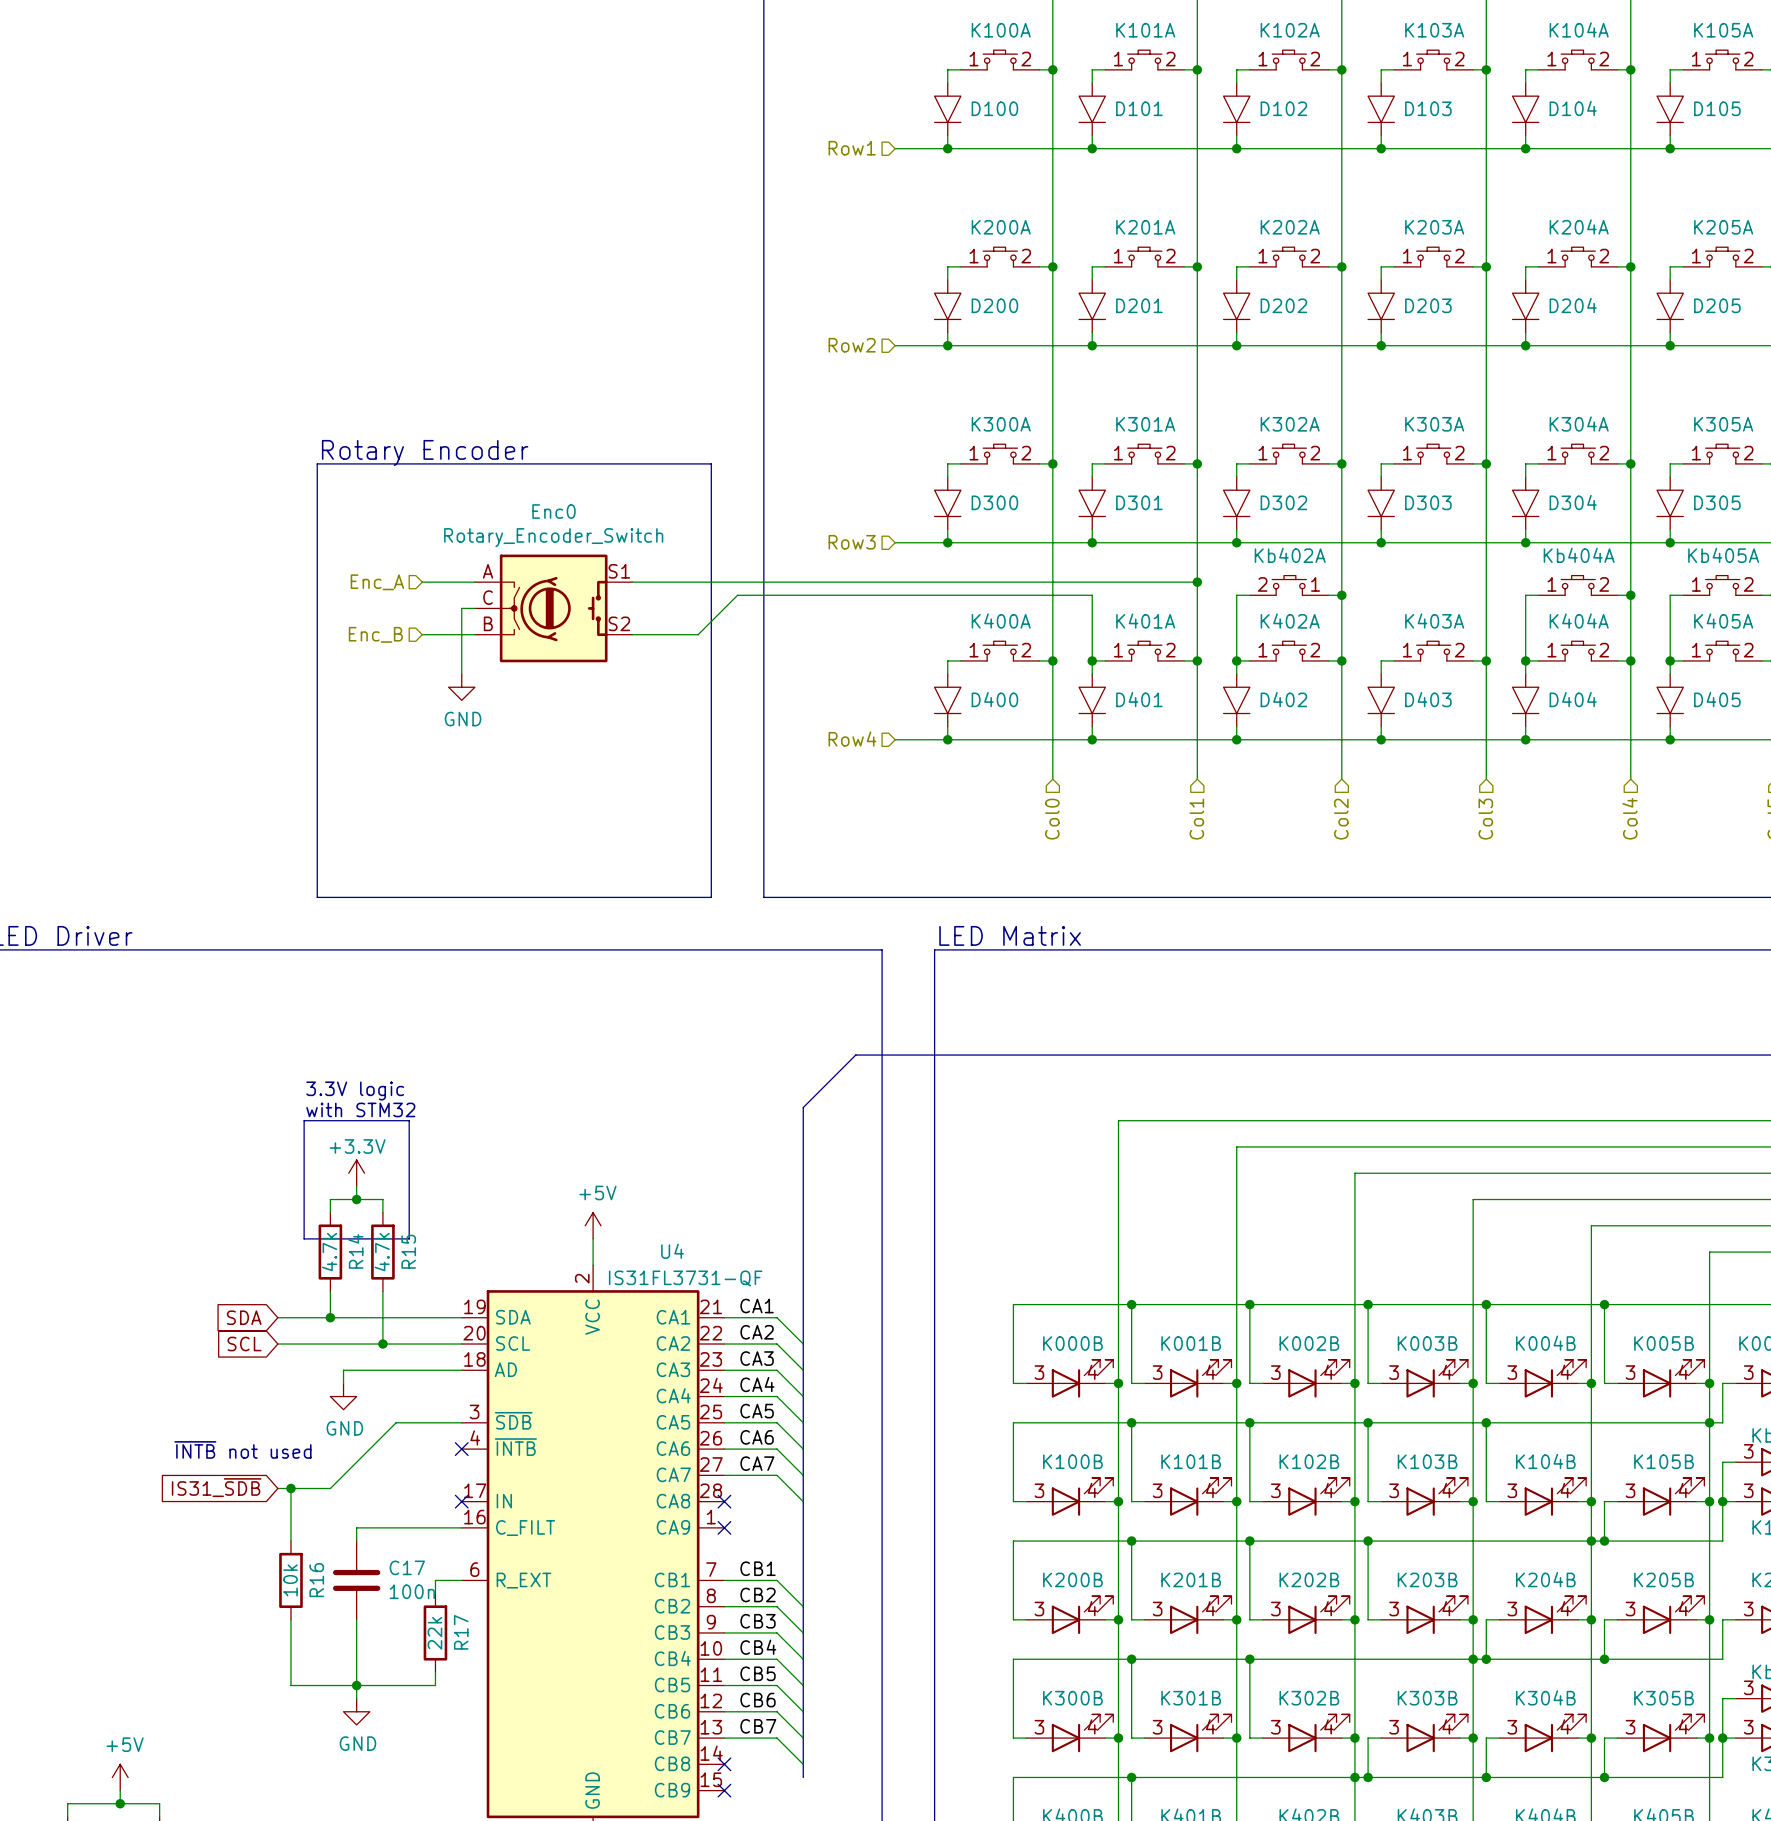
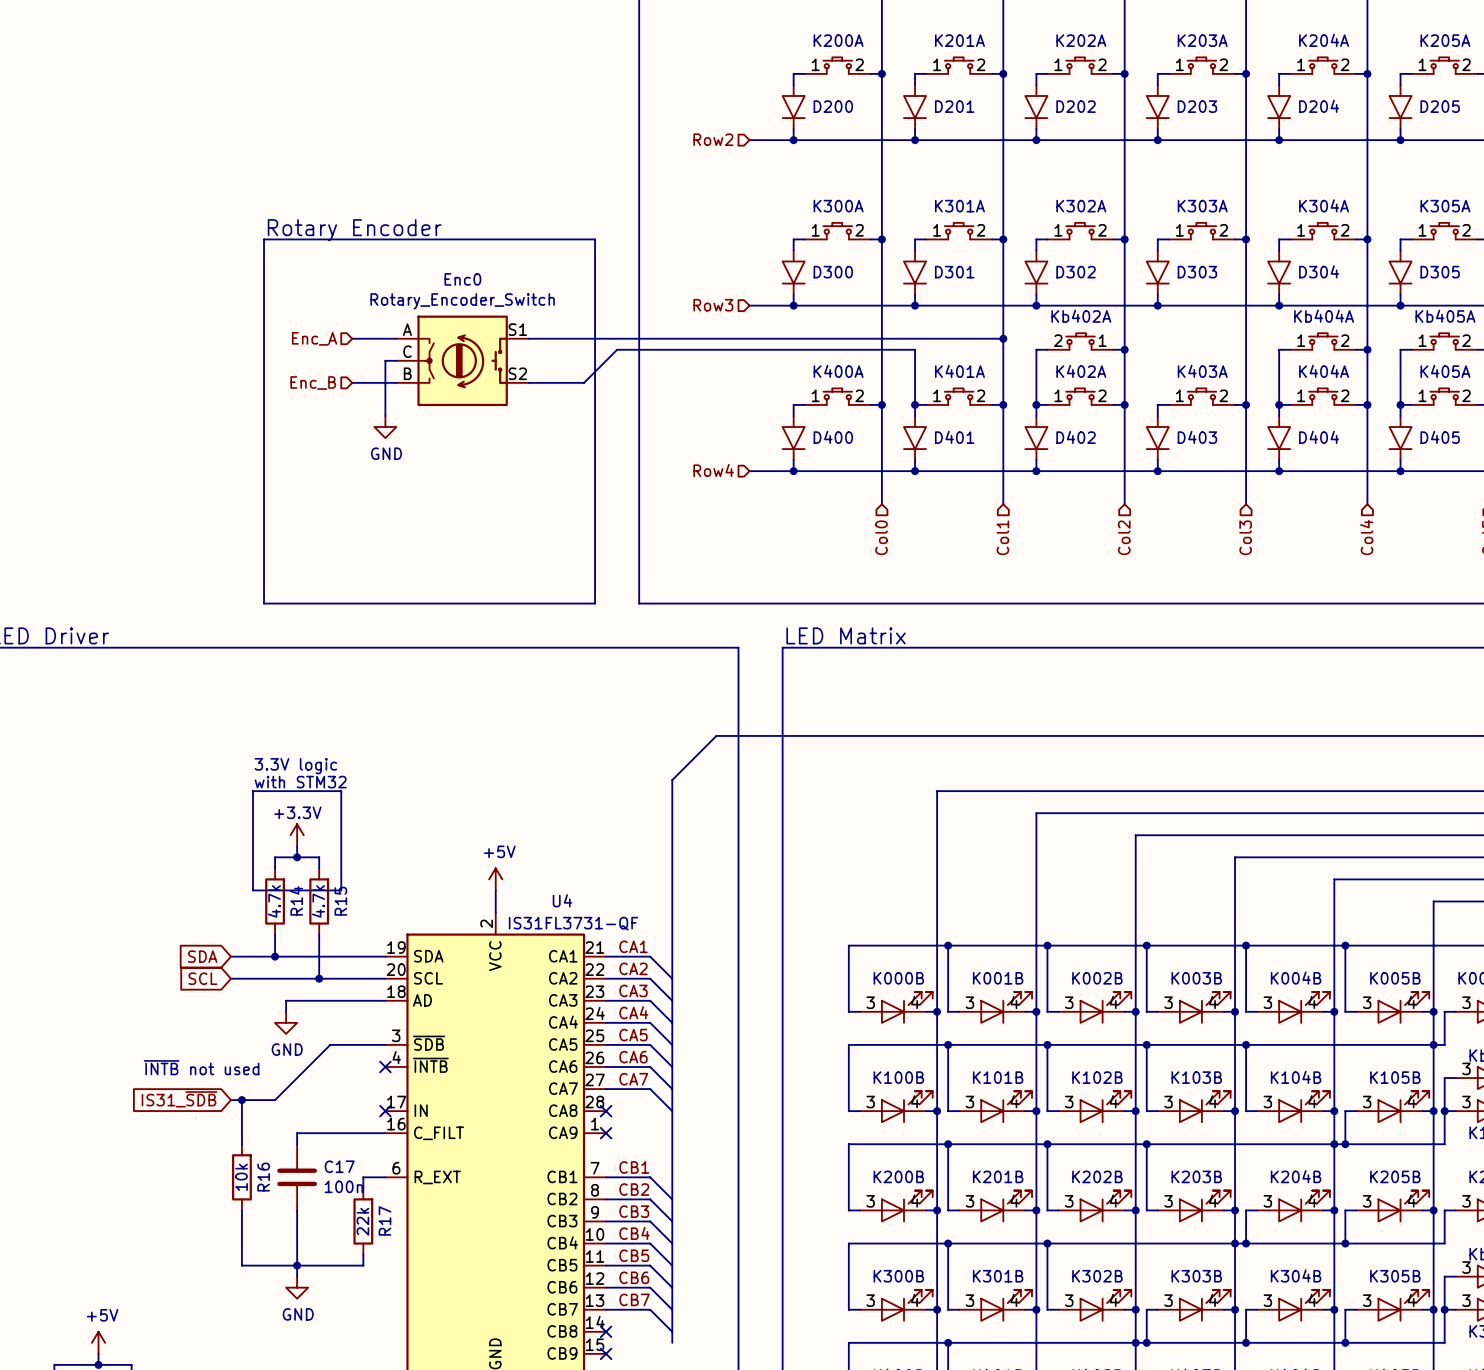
Enc0 symbol: [474, 554, 633, 663] -> [396, 315, 529, 407]

